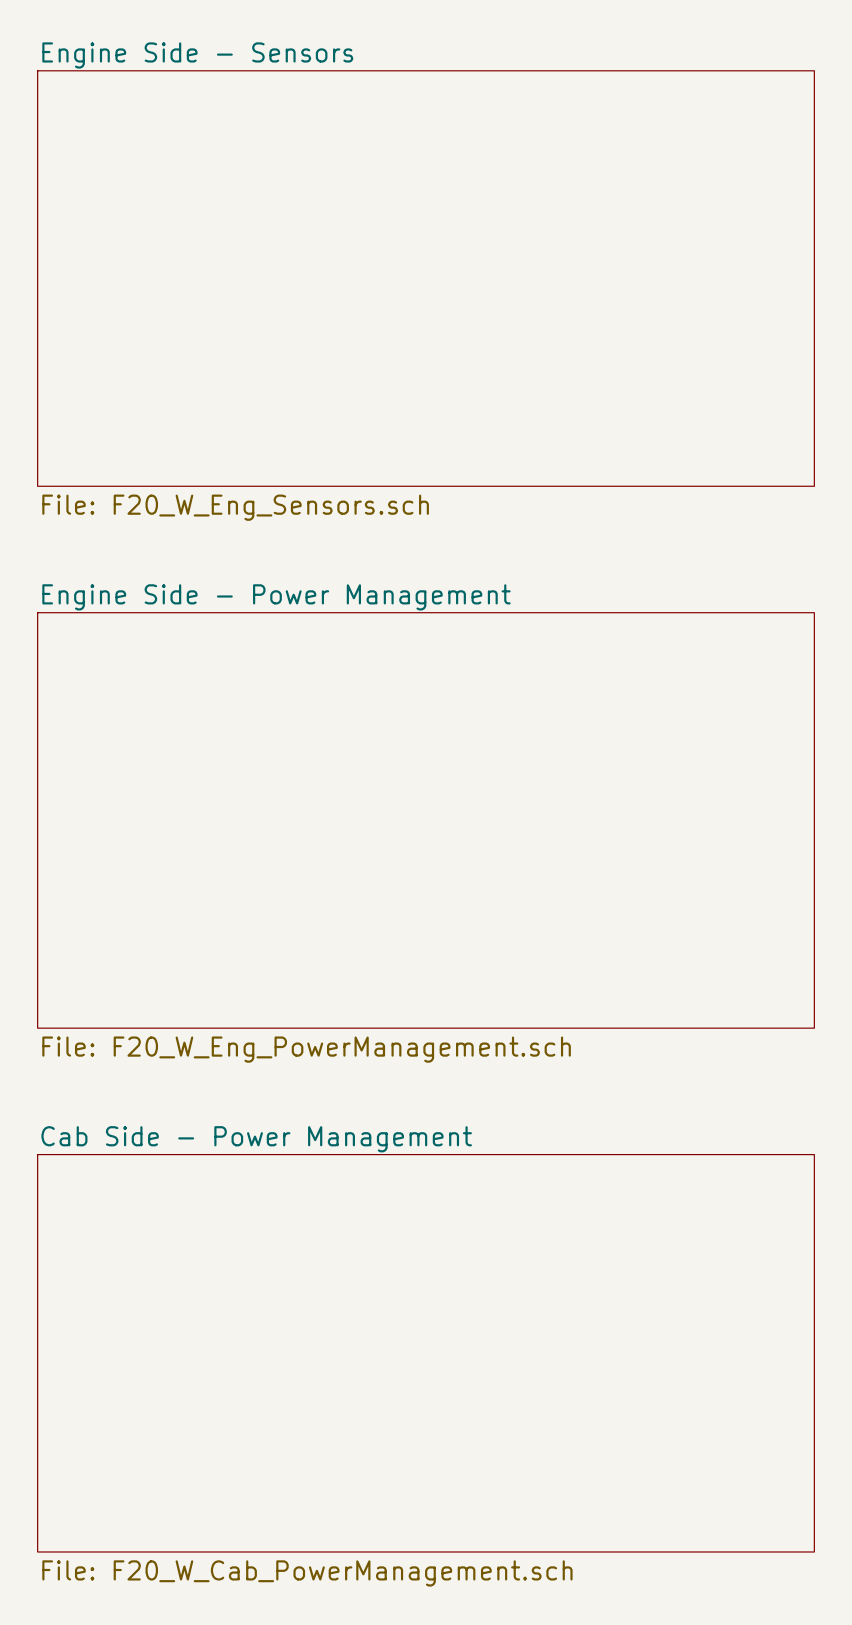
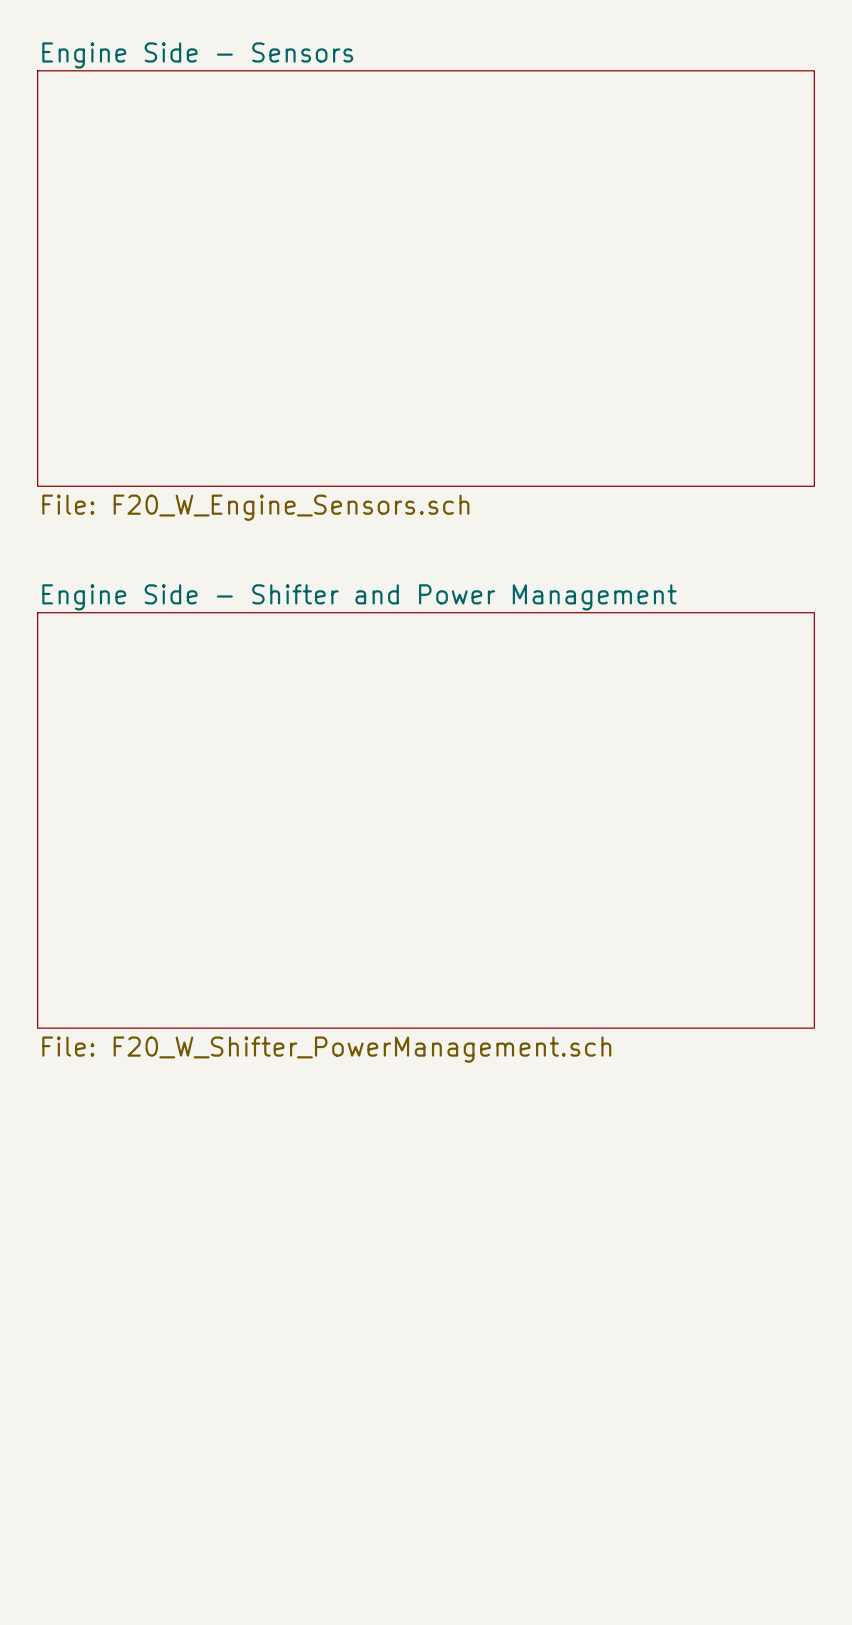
sheet Engine Side - Sensors value: File: F20_W_Eng_Sensors.sch (235, 507) -> File: F20_W_Engine_Sensors.sch (255, 507)
sheet Engine Side - Power Management name: Engine Side - Power Management (276, 597) -> Engine Side - Shifter and Power Management (359, 597)
sheet Engine Side - Power Management value: File: F20_W_Eng_PowerManagement.sch (306, 1049) -> File: F20_W_Shifter_PowerManagement.sch (326, 1049)
sheet Cab Side - Power Management: File: F20_W_Cab_PowerManagement.sch (426, 1353) -> none

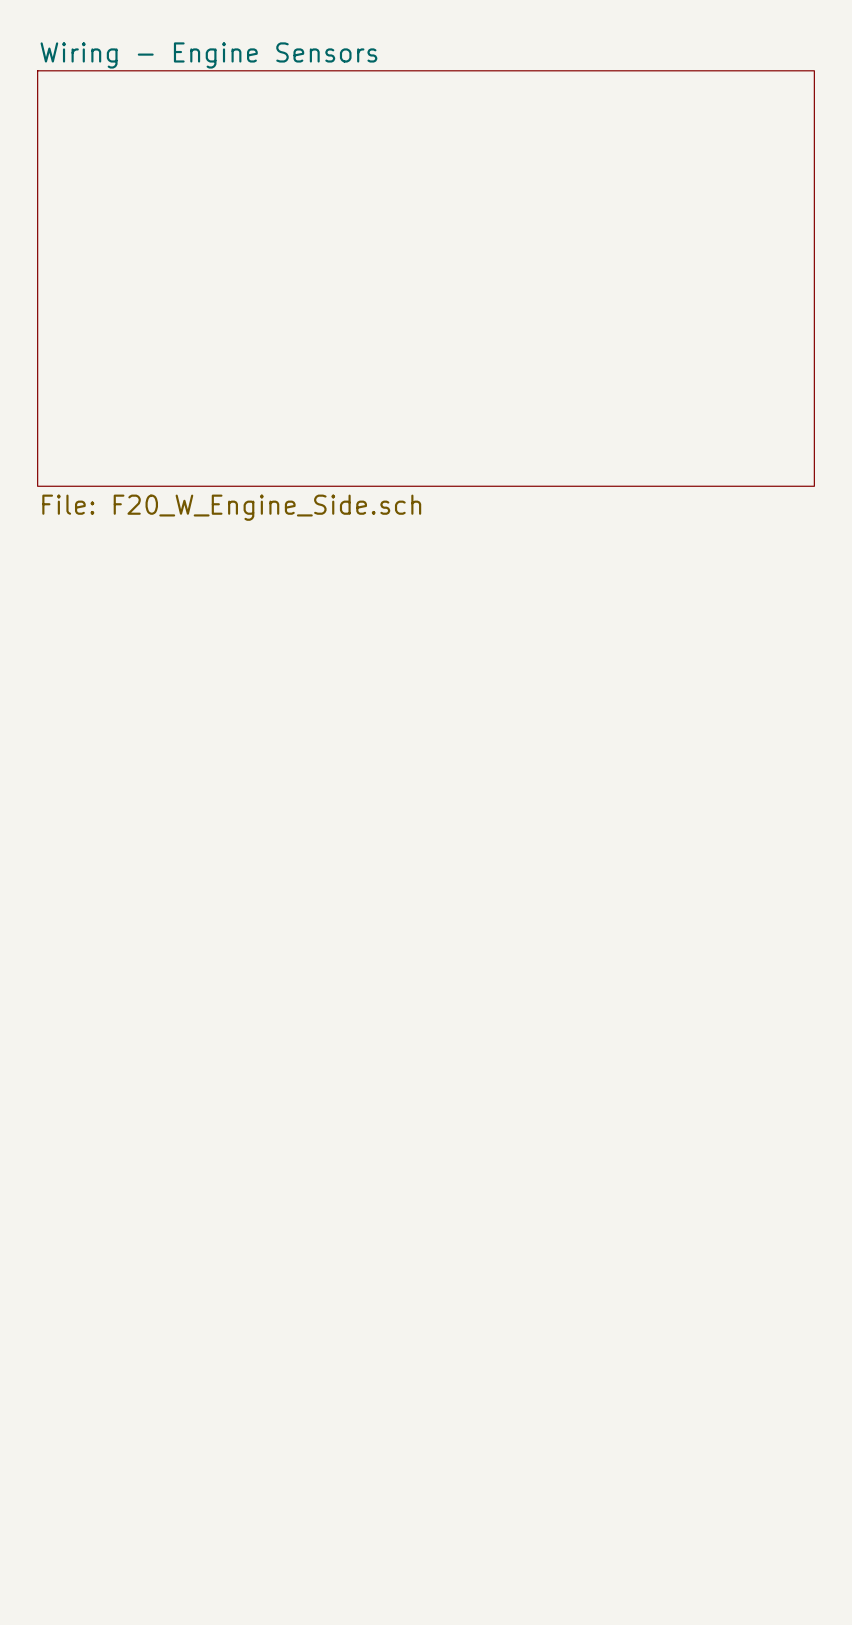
sheet Engine Side - Sensors name: Engine Side - Sensors (197, 55) -> Wiring - Engine Sensors (208, 55)
sheet Engine Side - Sensors value: File: F20_W_Engine_Sensors.sch (255, 507) -> File: F20_W_Engine_Side.sch (231, 507)
sheet Engine Side - Shifter and Power Management: File: F20_W_Shifter_PowerManagement.sch (426, 820) -> none

